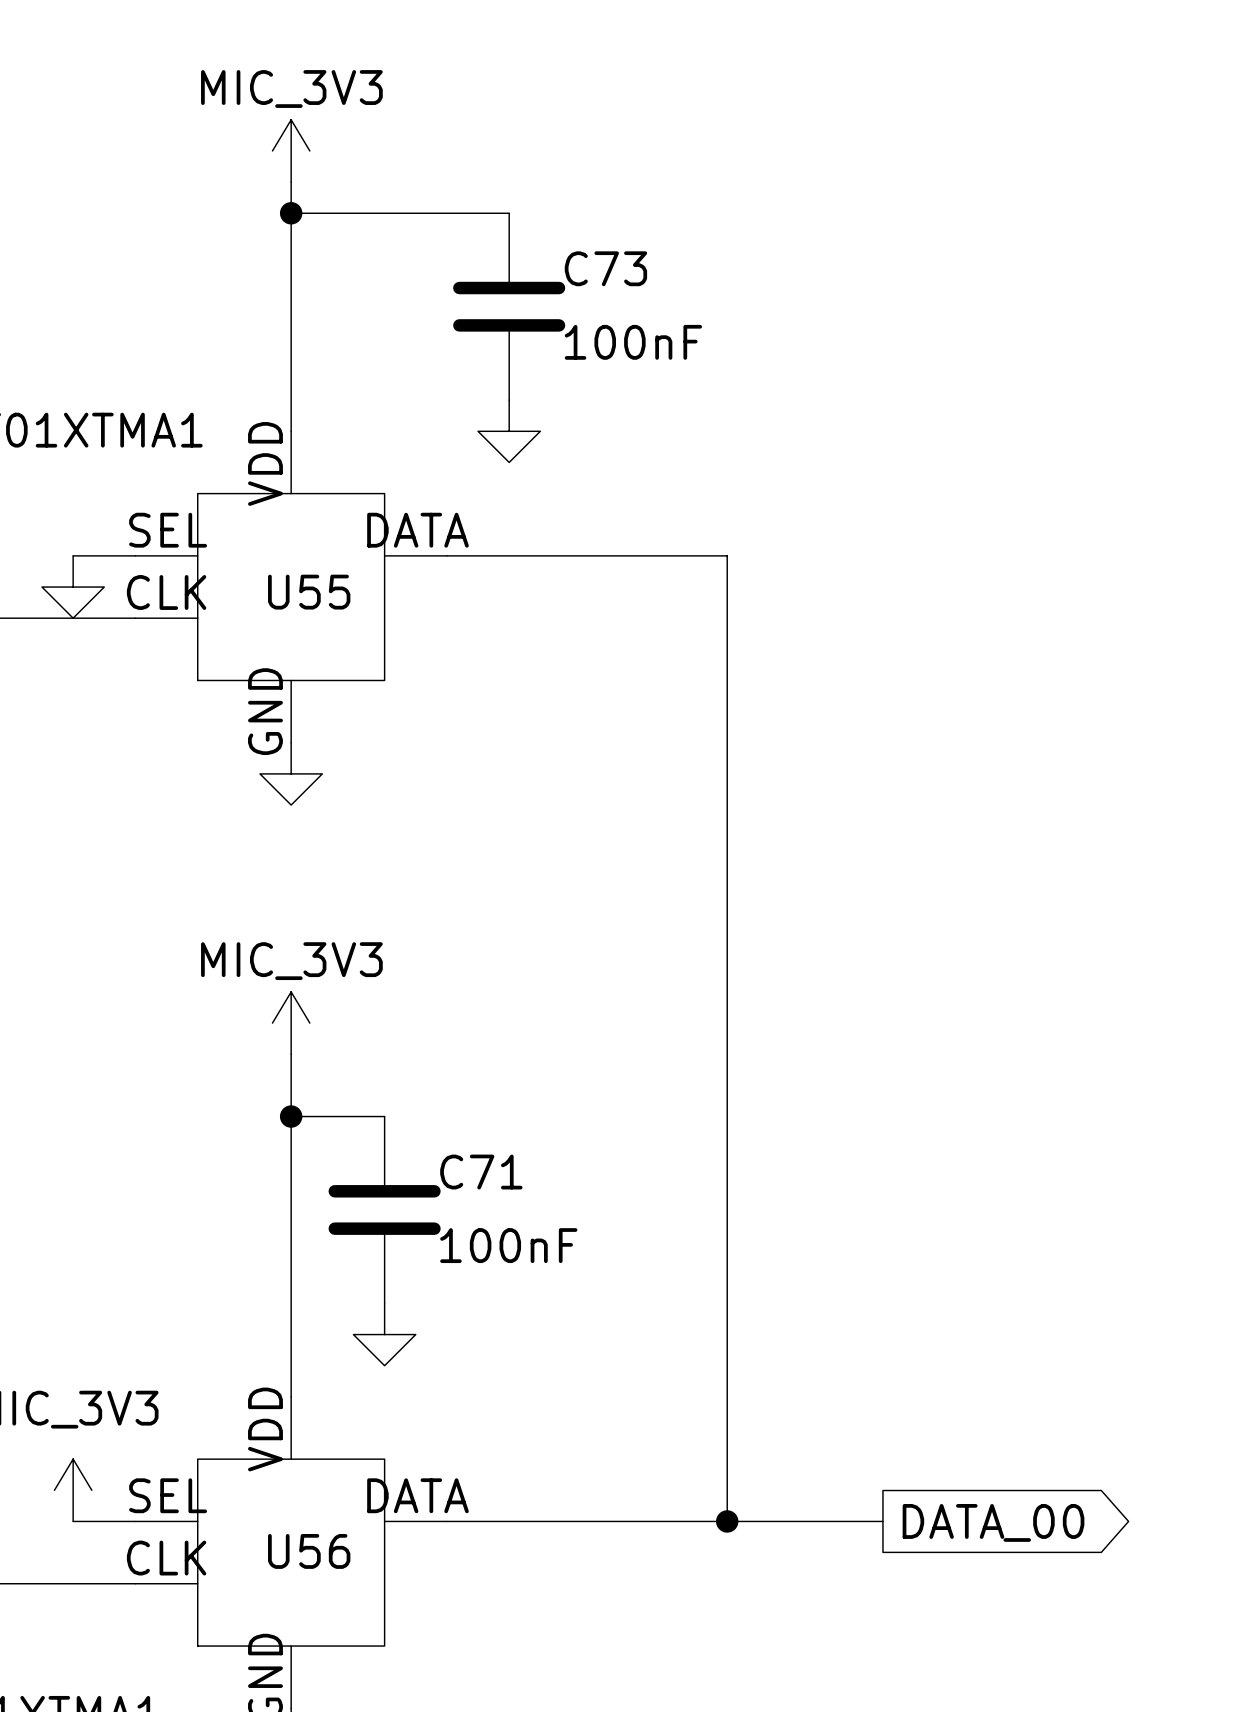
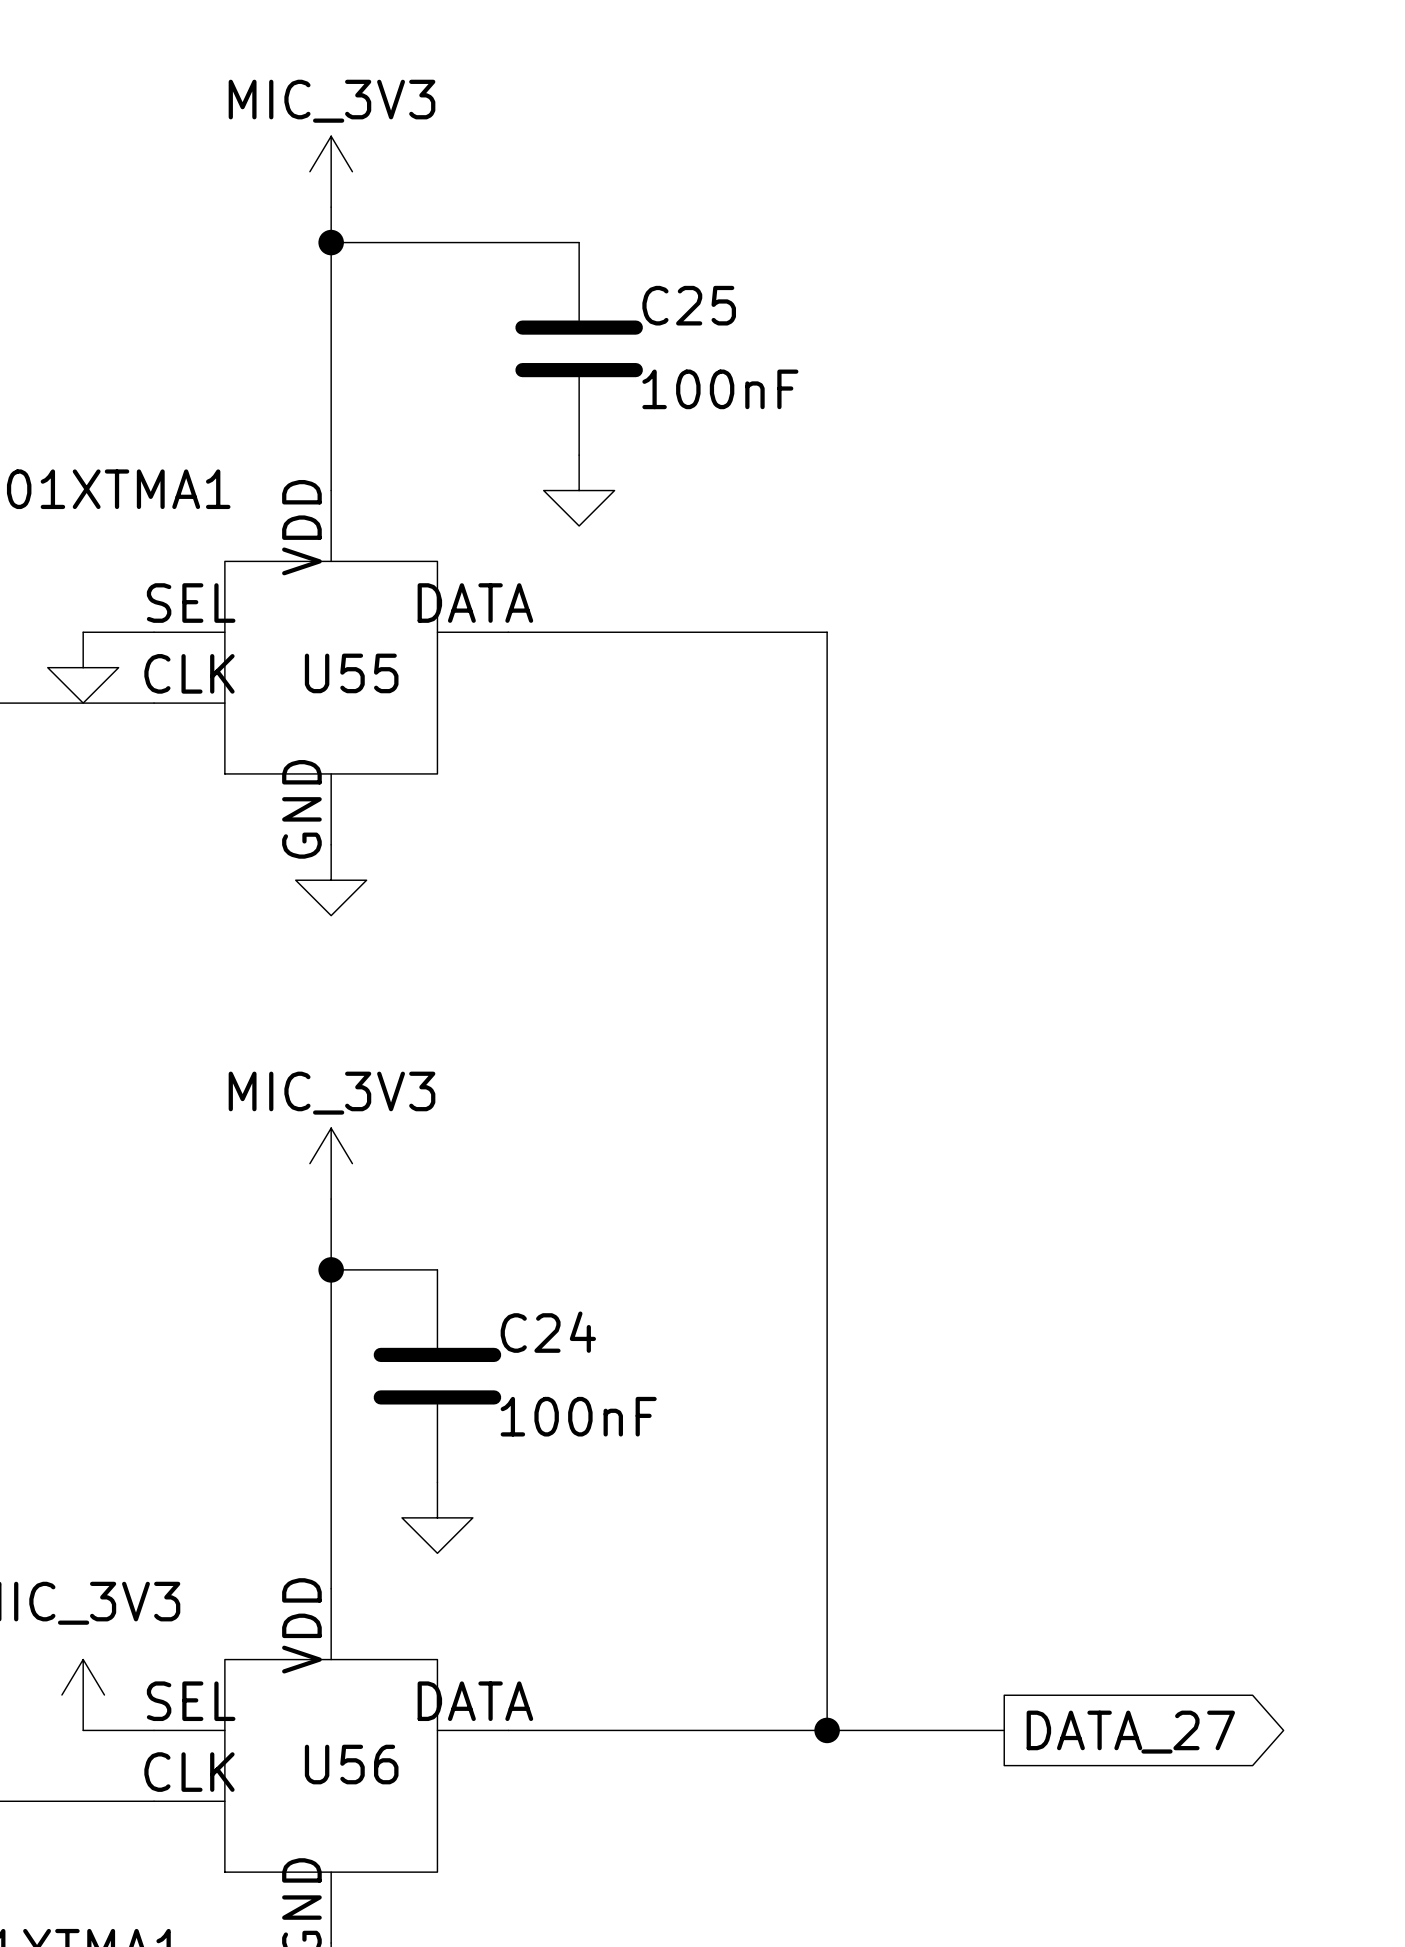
C73 name: C73 (605, 268) -> C25 (689, 305)
C71 name: C71 (481, 1172) -> C24 (548, 1332)
global label: DATA_00 (993, 1522) -> DATA_27 (1130, 1732)

